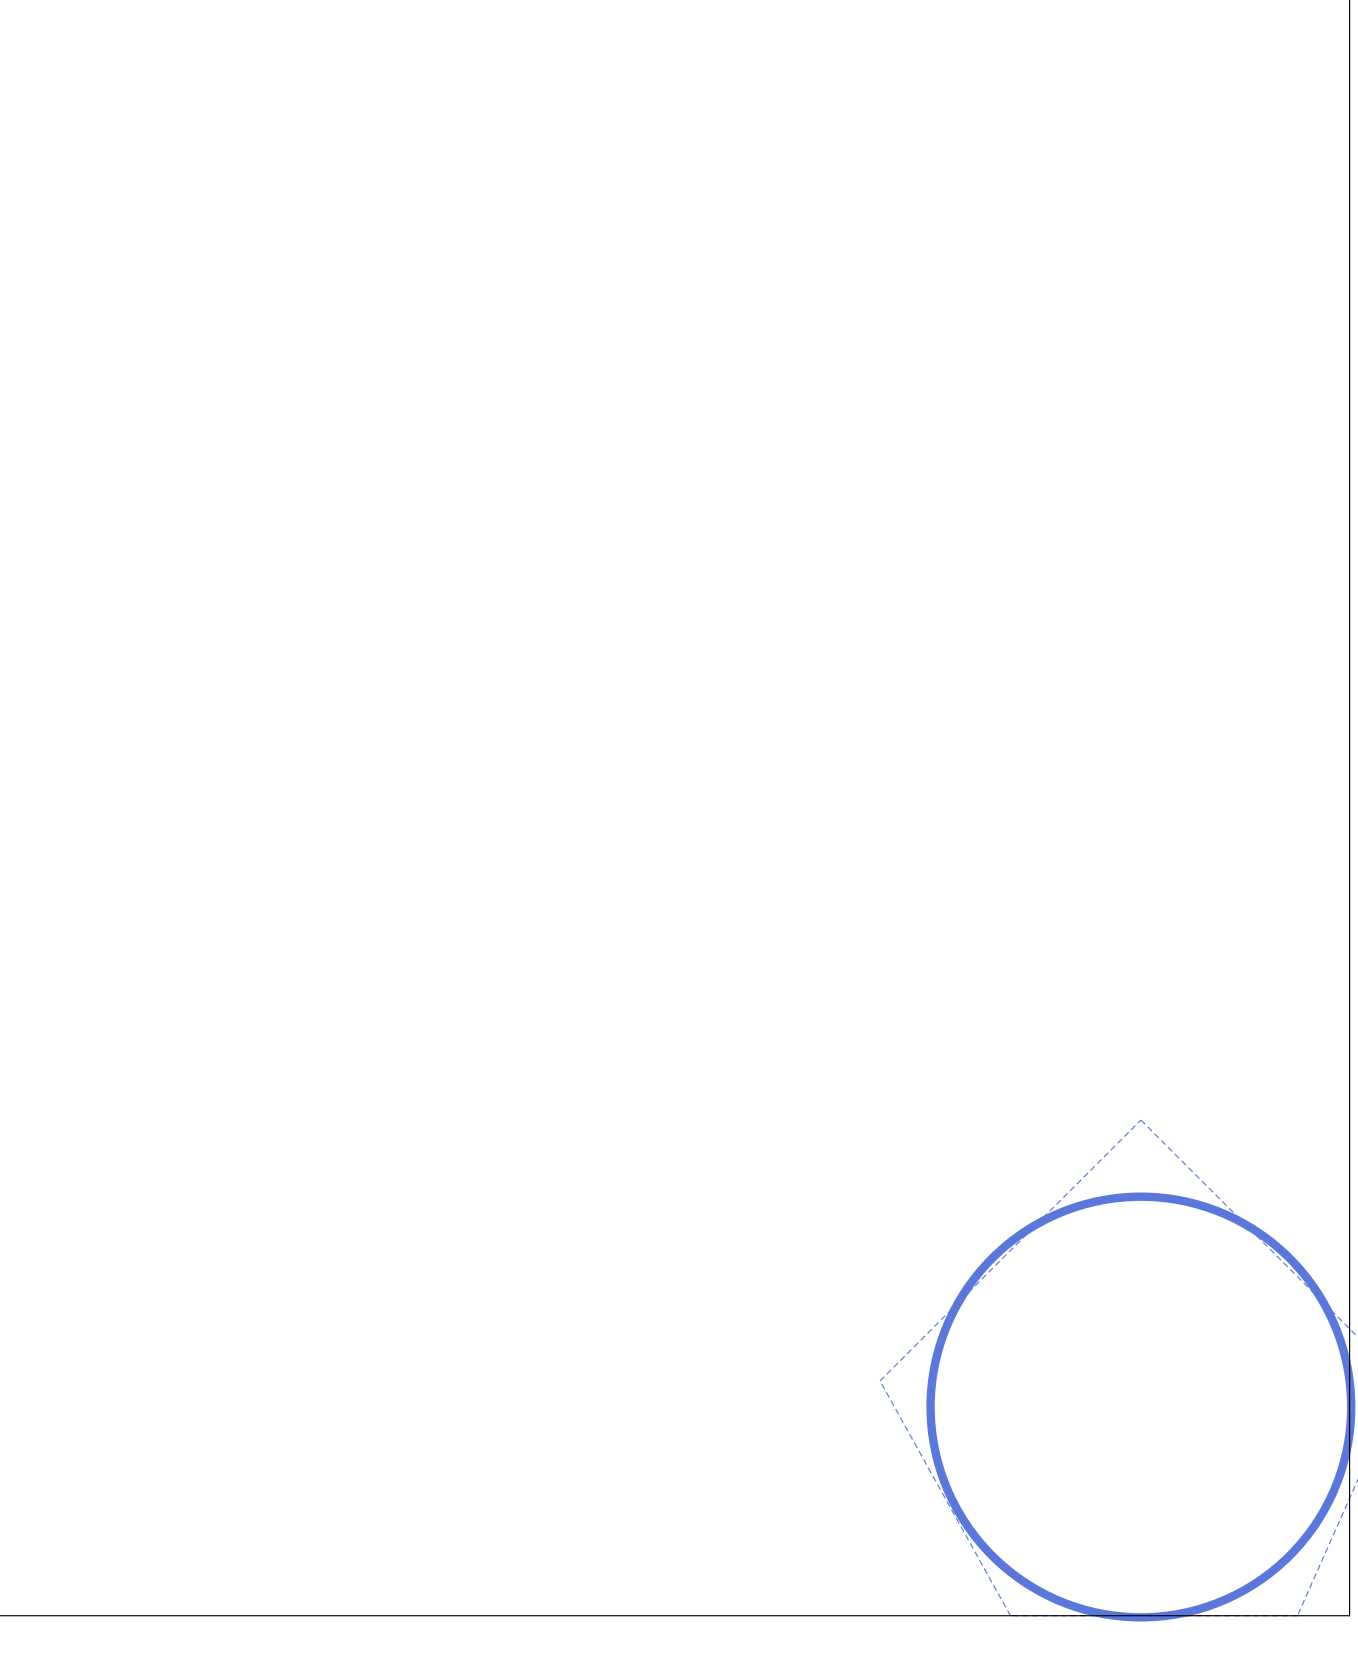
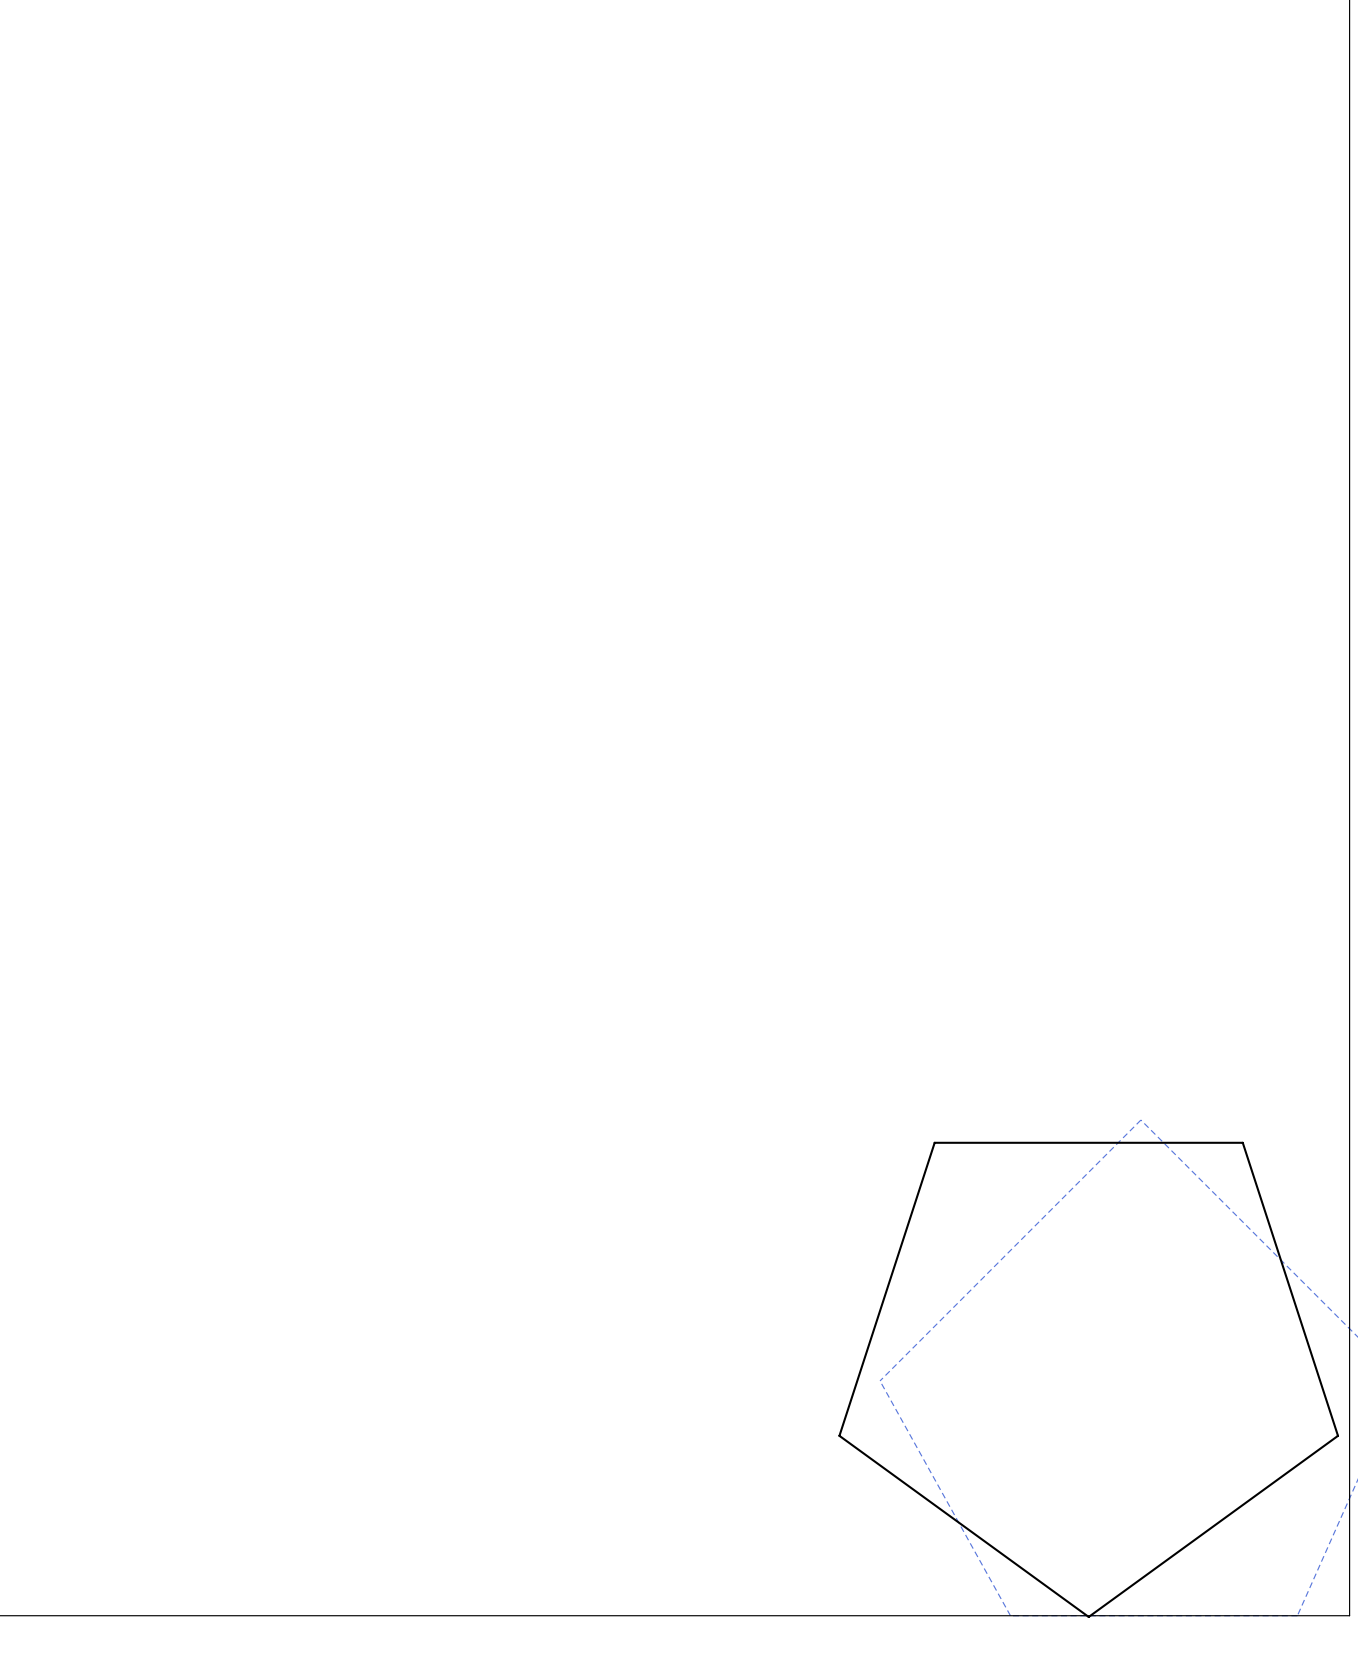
board edge: none -> (1242, 1142) (934, 1142) (839, 1435) (1088, 1616) (1338, 1435) (1242, 1142)
drawing: [926, 1192, 1356, 1622] -> none

